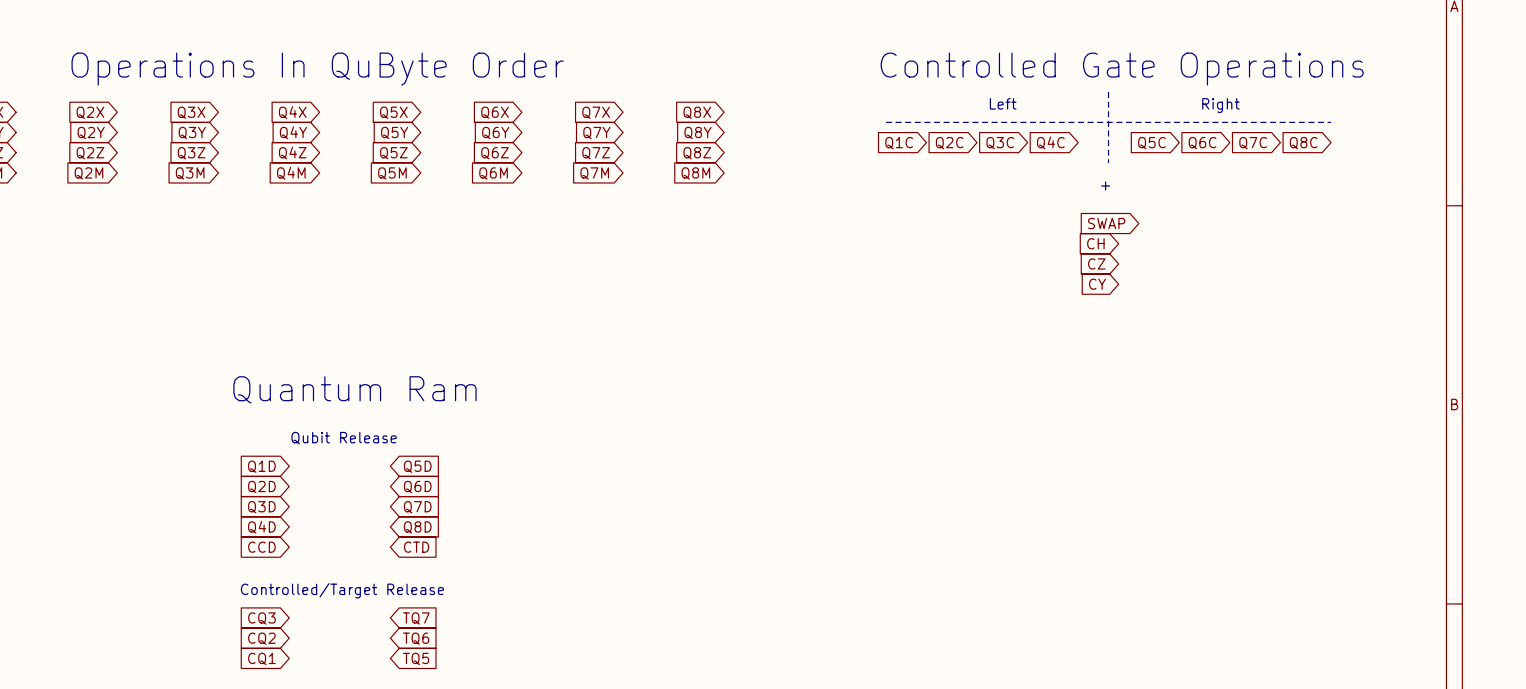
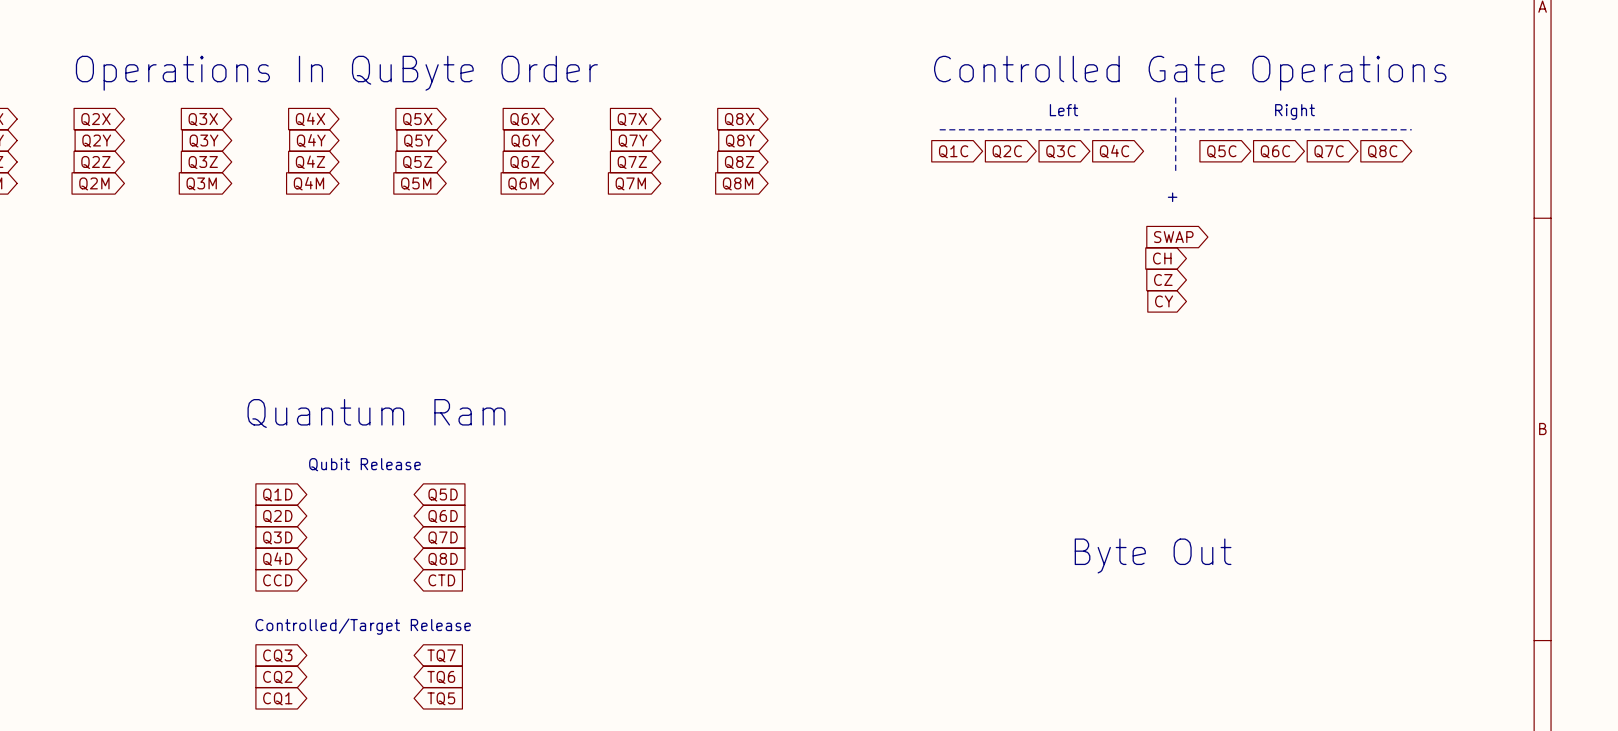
text: none -> Byte Out (1153, 555)

